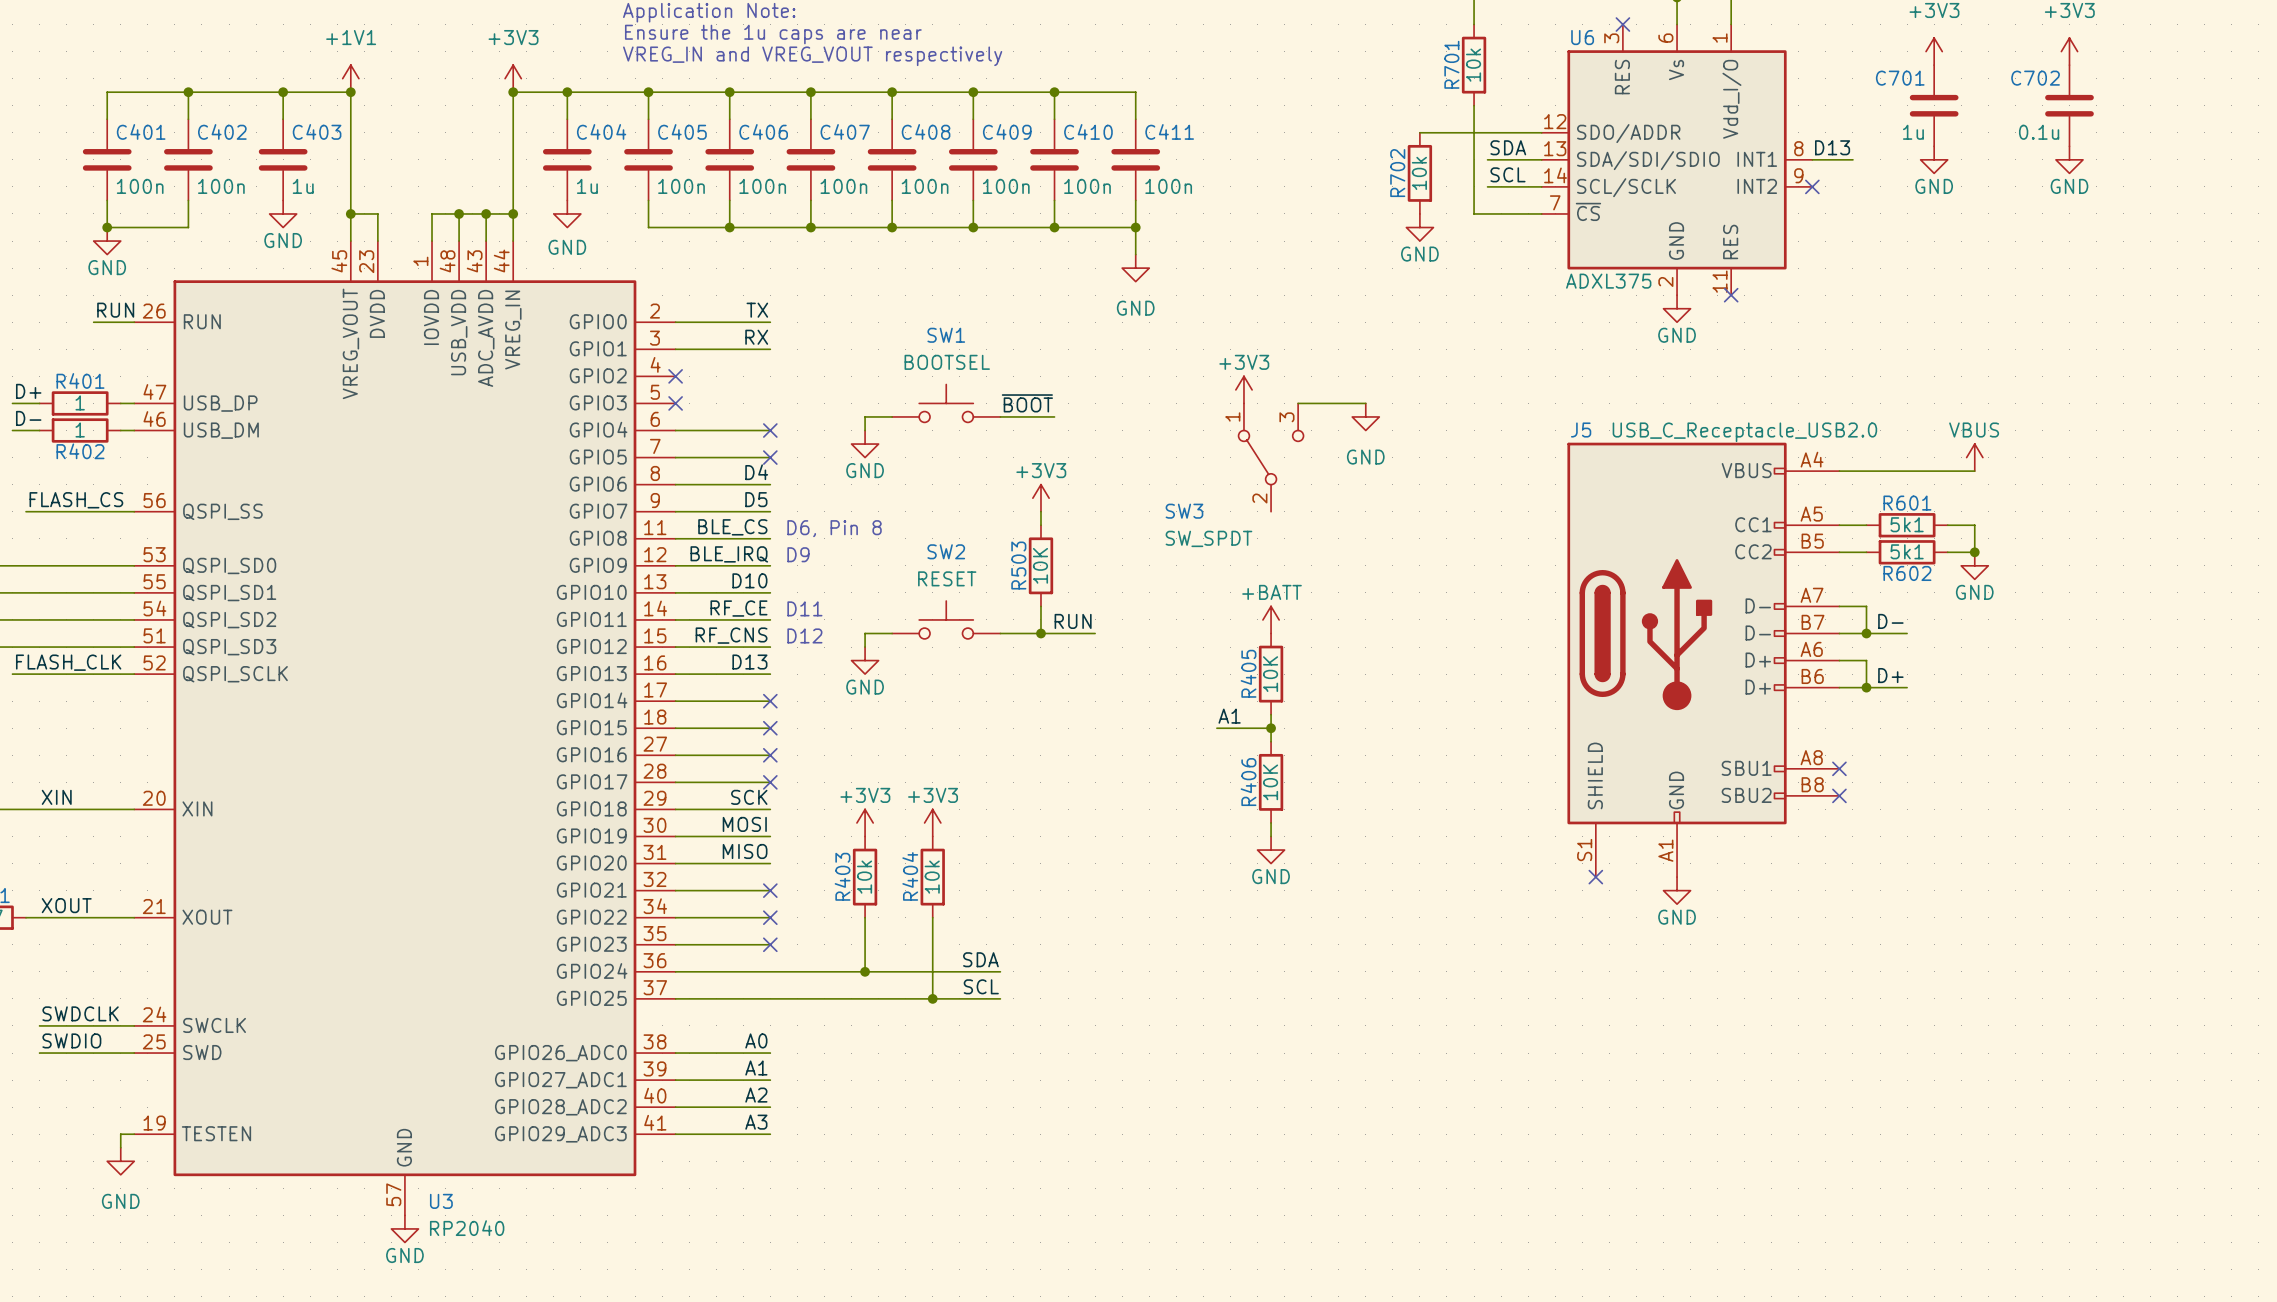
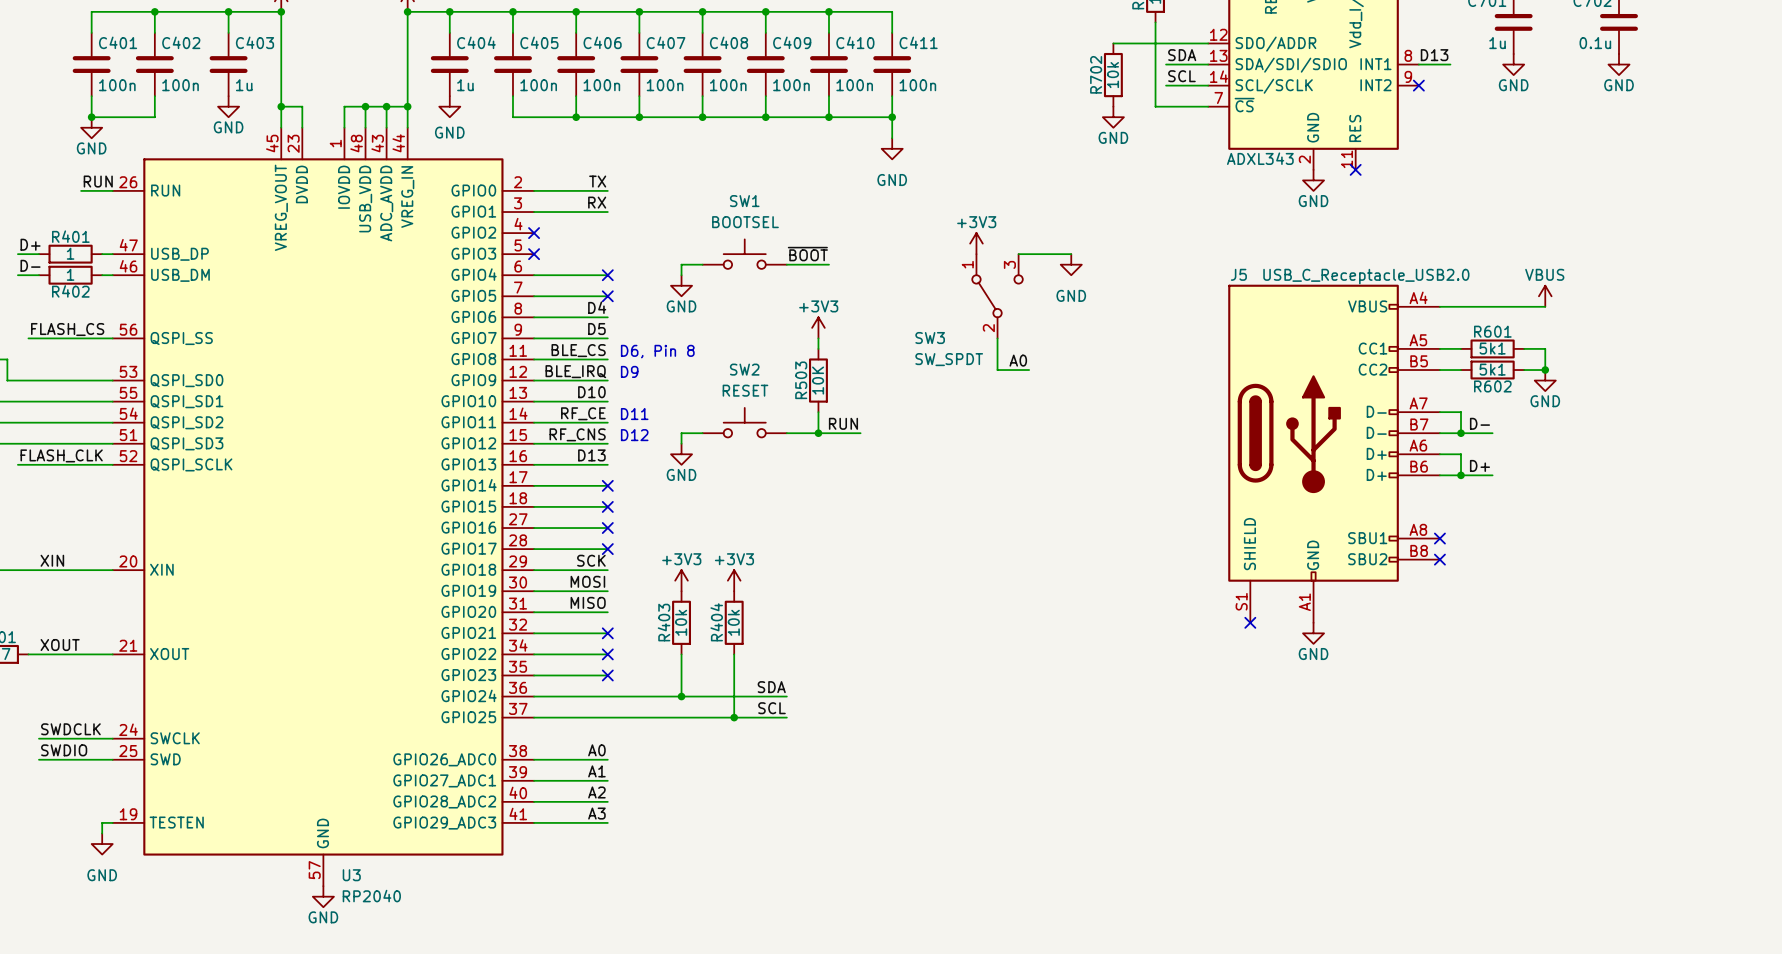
U6 value: ADXL375 (1608, 281) -> ADXL343 (1260, 158)
wire: none -> (997, 338) (997, 370) (1029, 370)
label: none -> A0 (1018, 360)
power symbol: +BATT (1271, 619) -> none
R405: 10K (1271, 674) -> none
wire: (1271, 714) (1271, 741) -> none
label: A1 (1229, 716) -> none
wire: (1216, 728) (1271, 728) -> none
junction: (1271, 728) -> none
R406: 10K (1271, 782) -> none
wire: (1271, 822) (1271, 836) -> none
power symbol: GND (1271, 850) -> none

